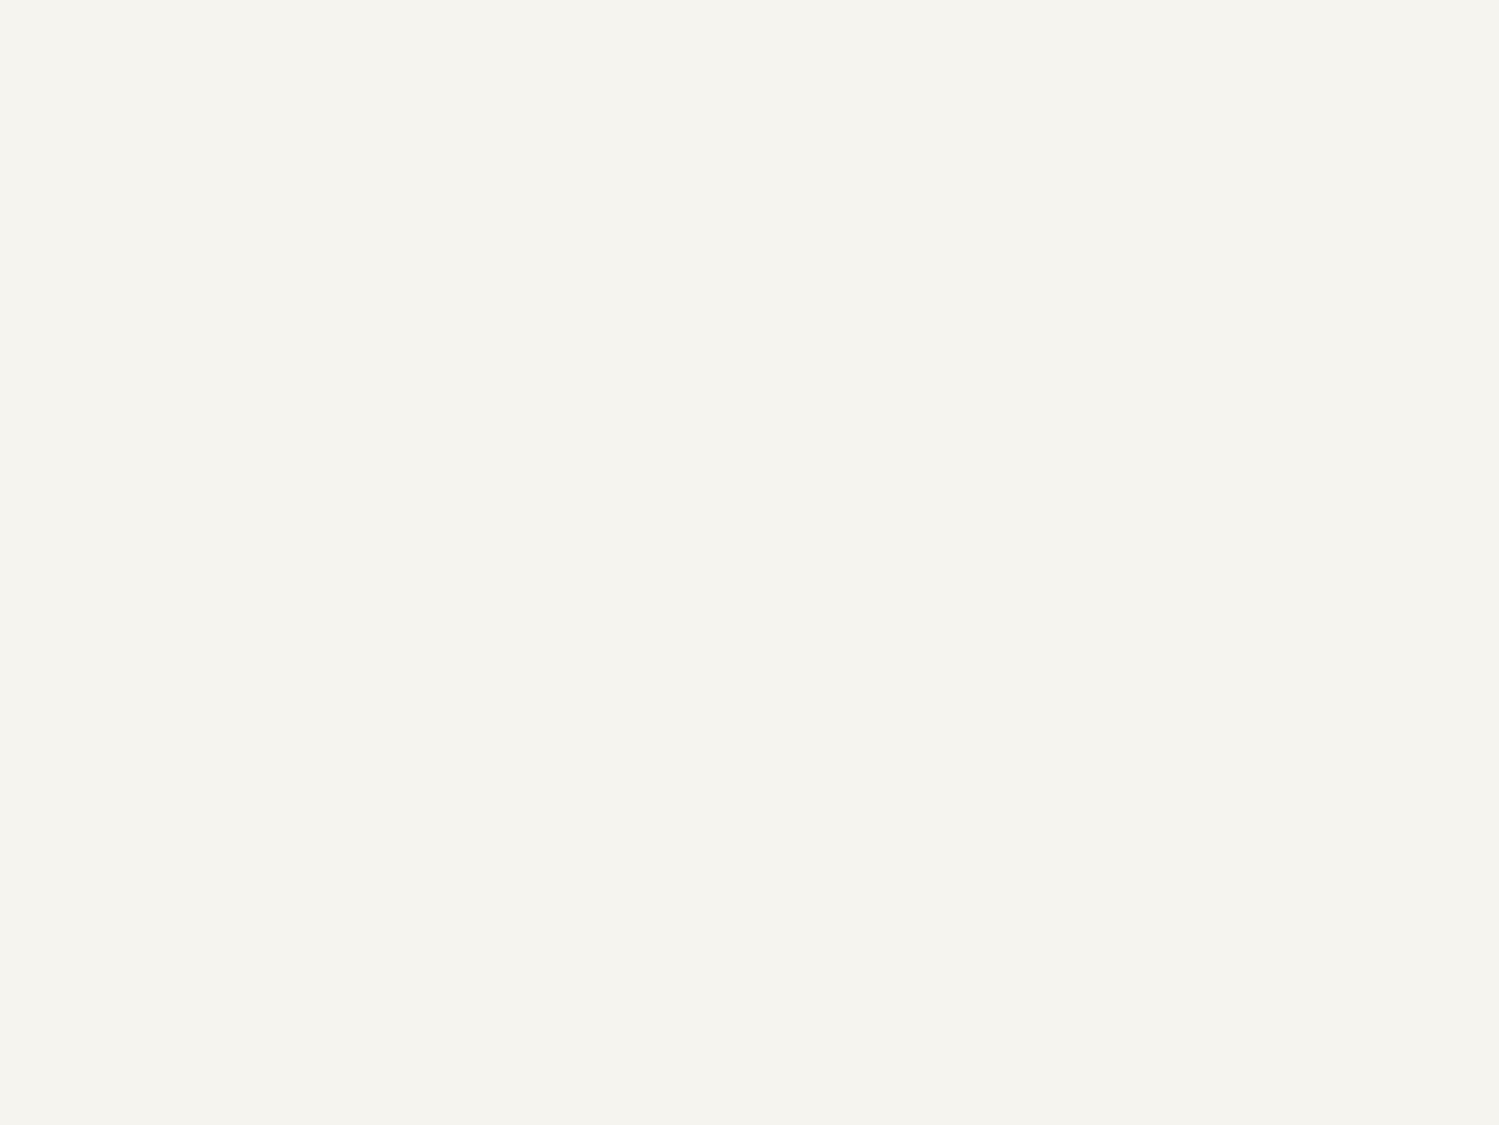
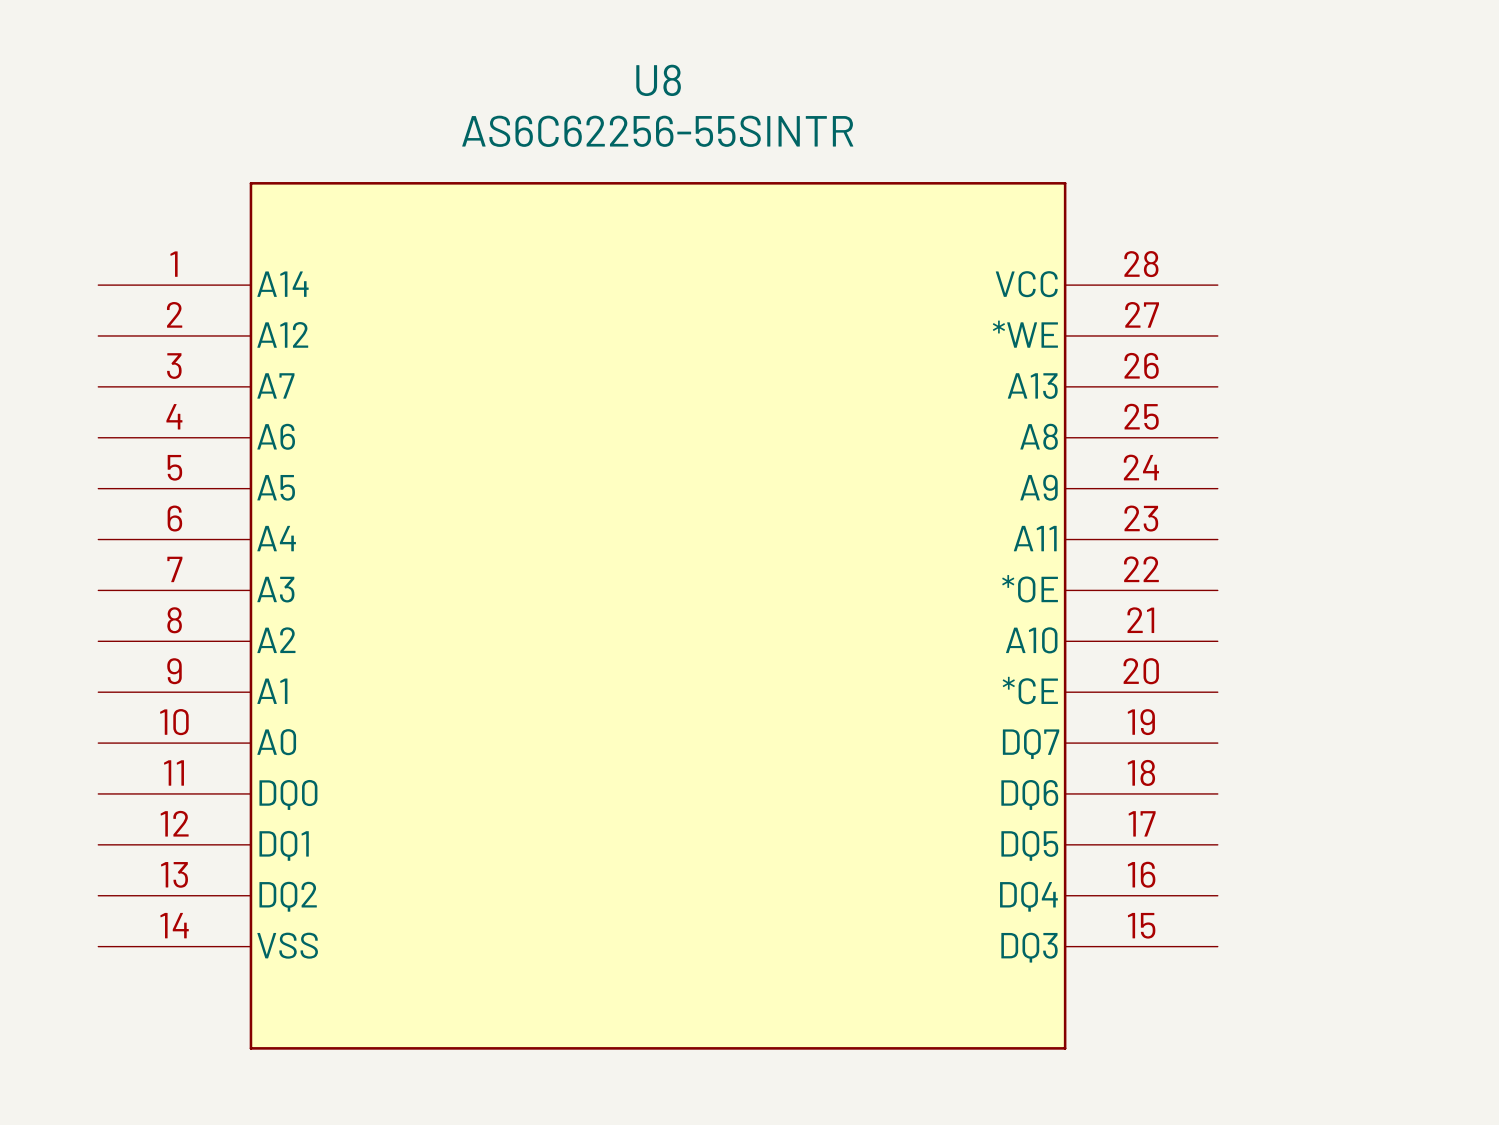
U8: none -> AS6C62256-55SINTR (658, 615)

